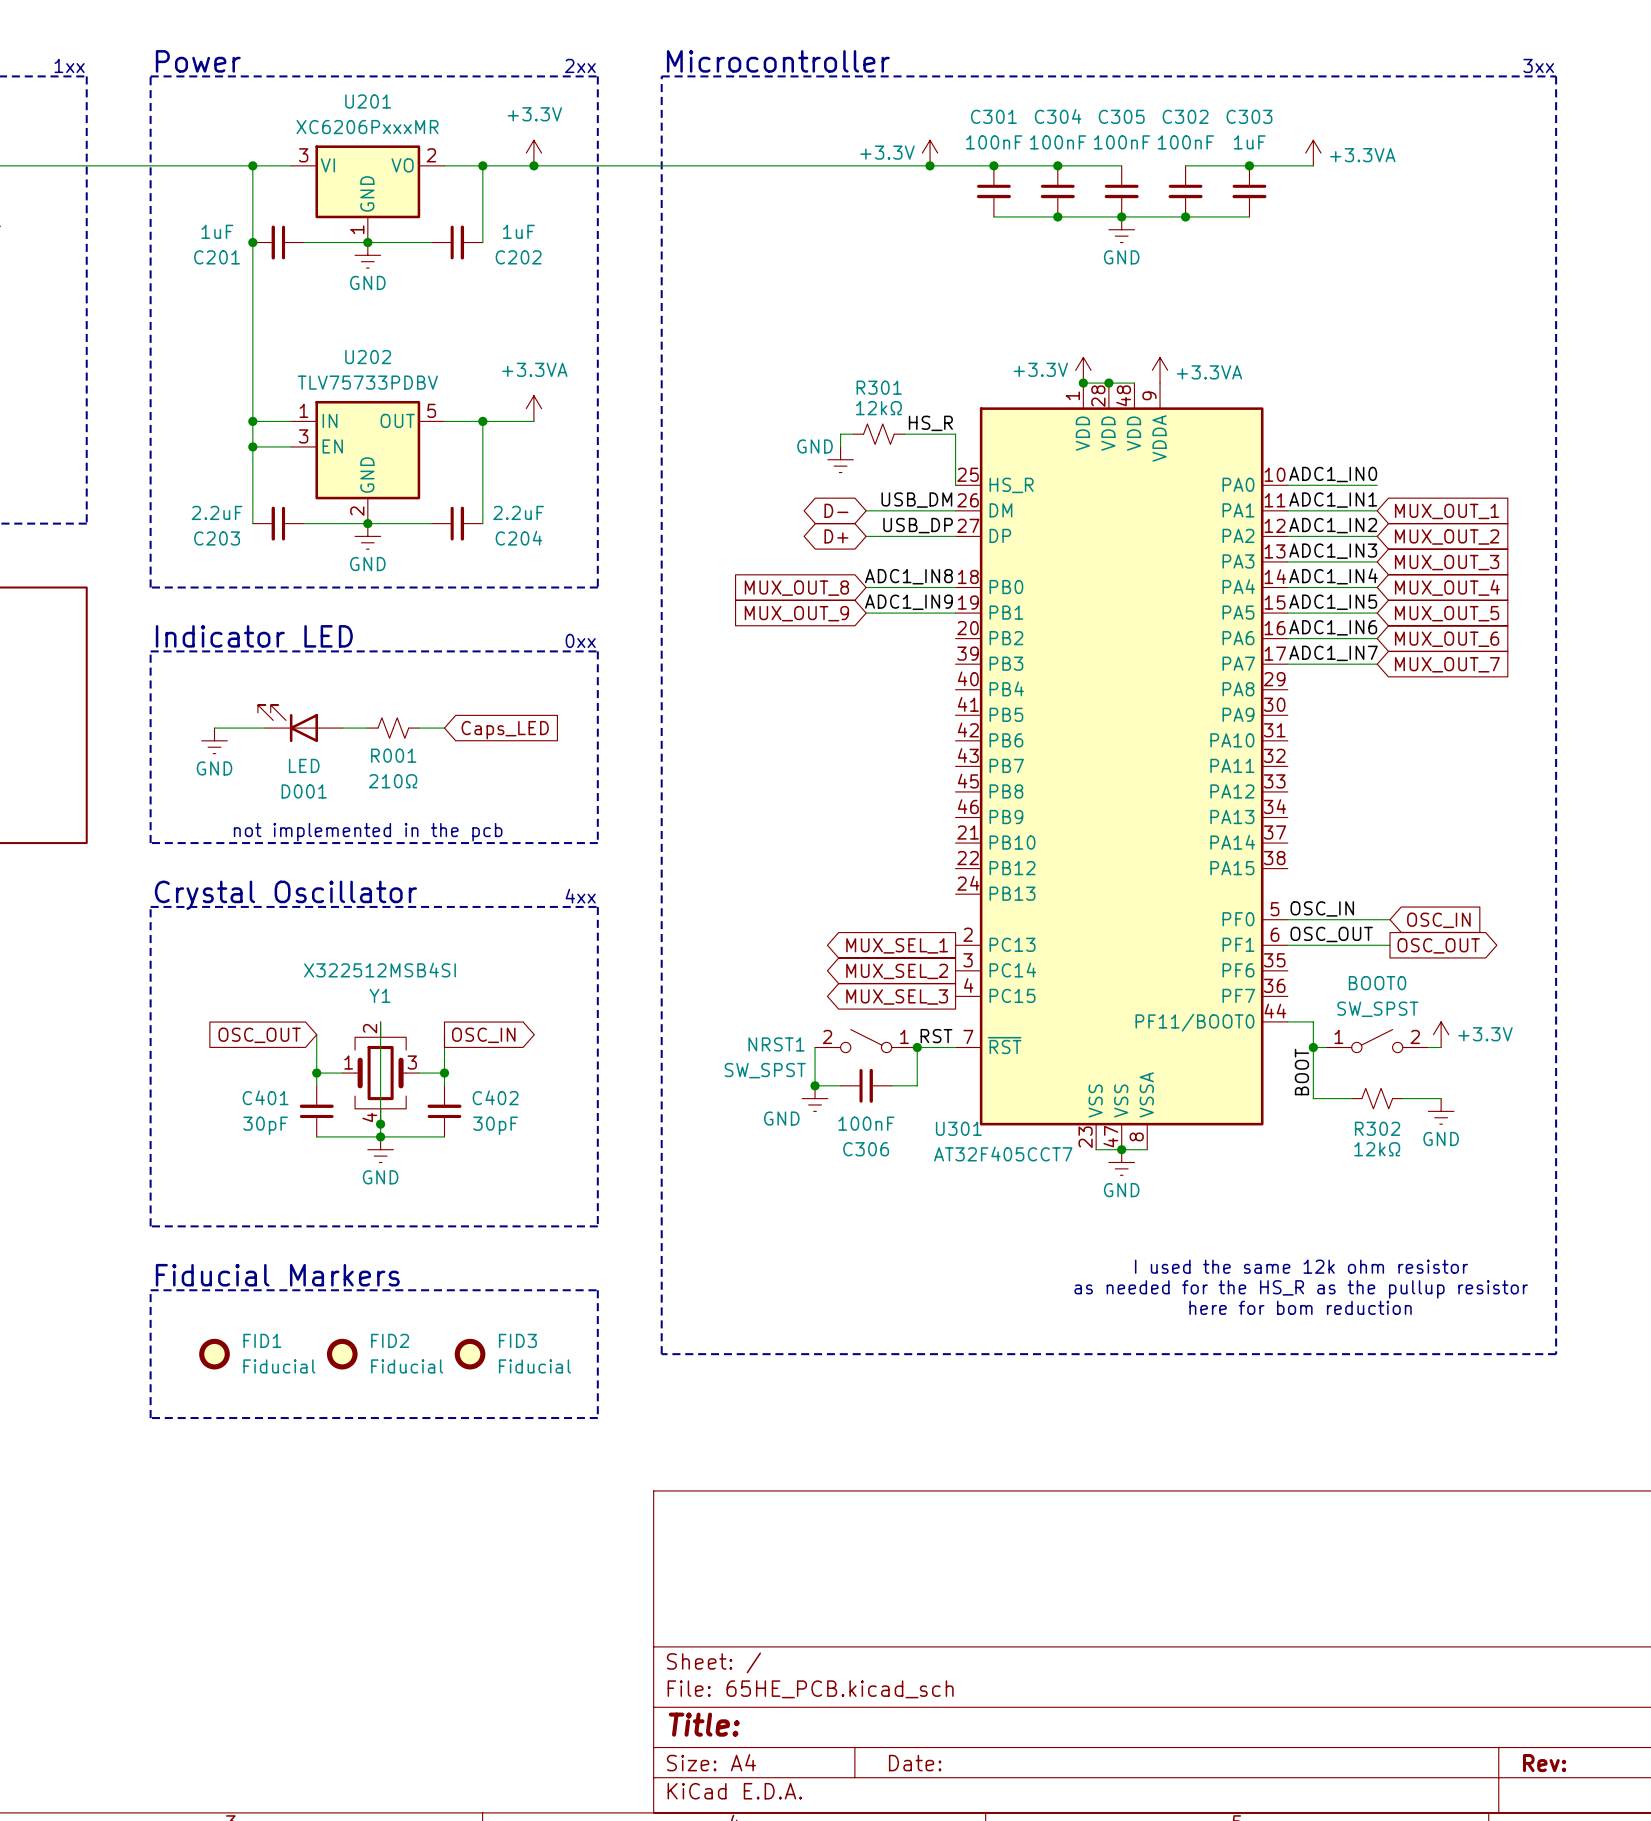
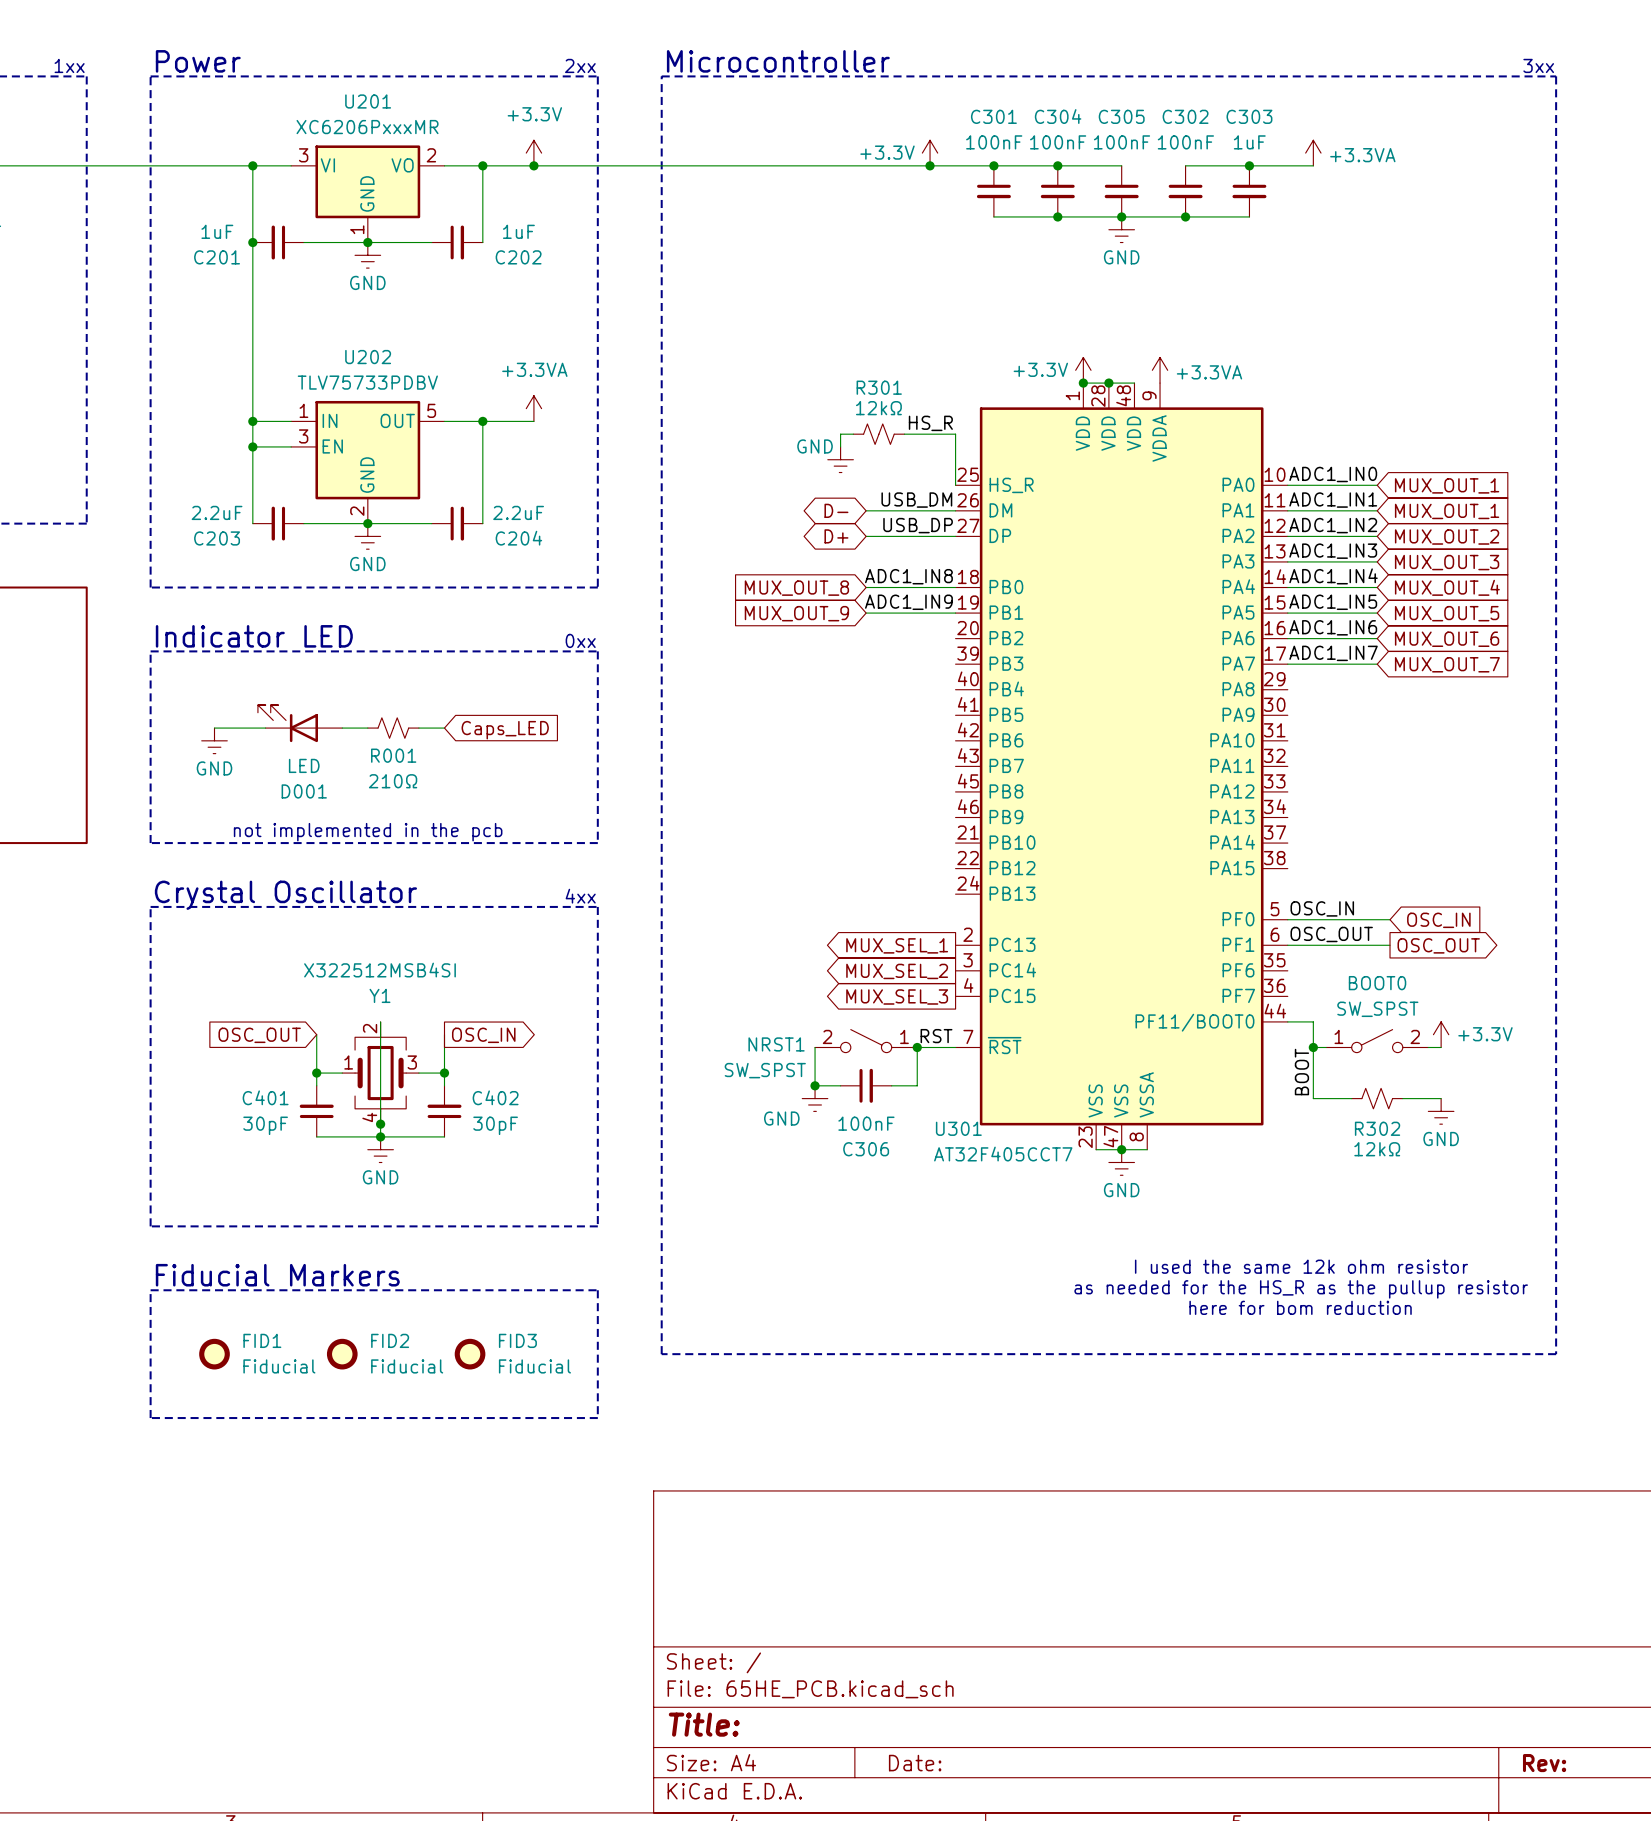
global label: none -> MUX_OUT_1 (1447, 485)

